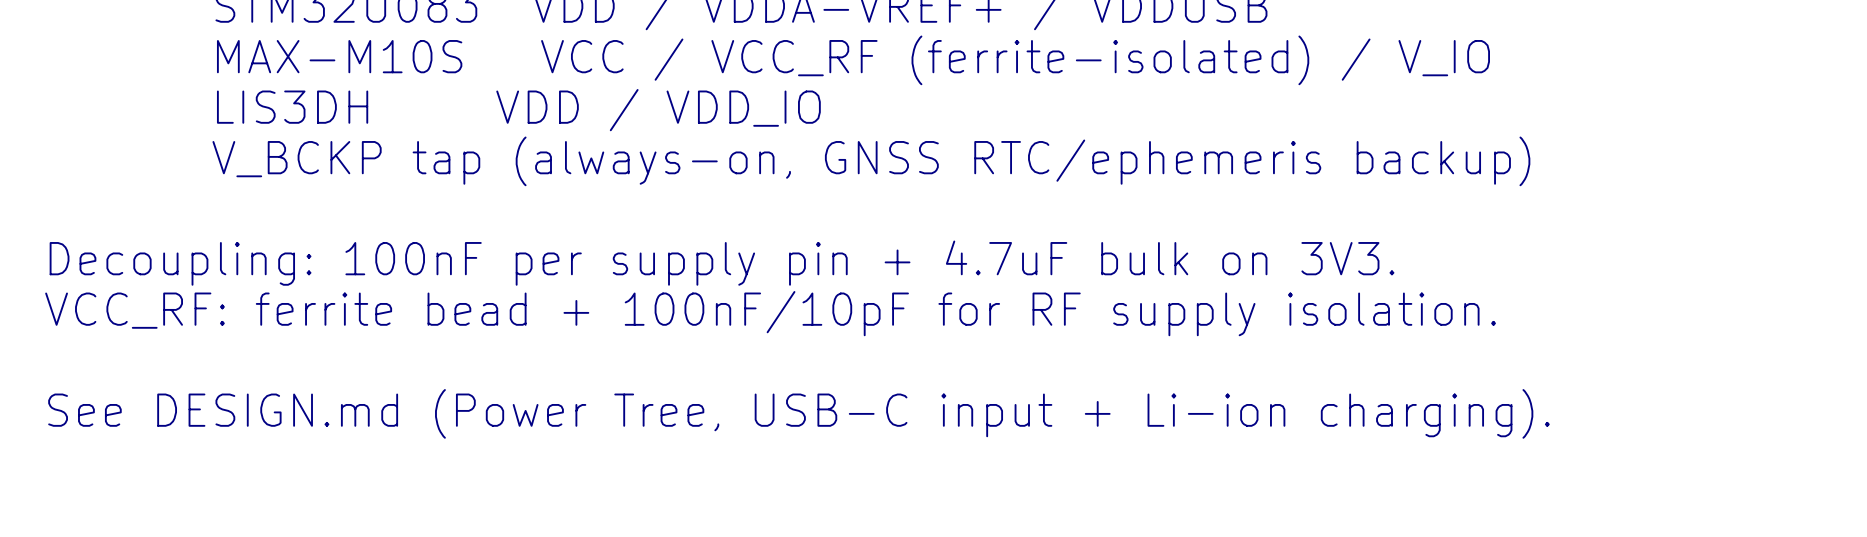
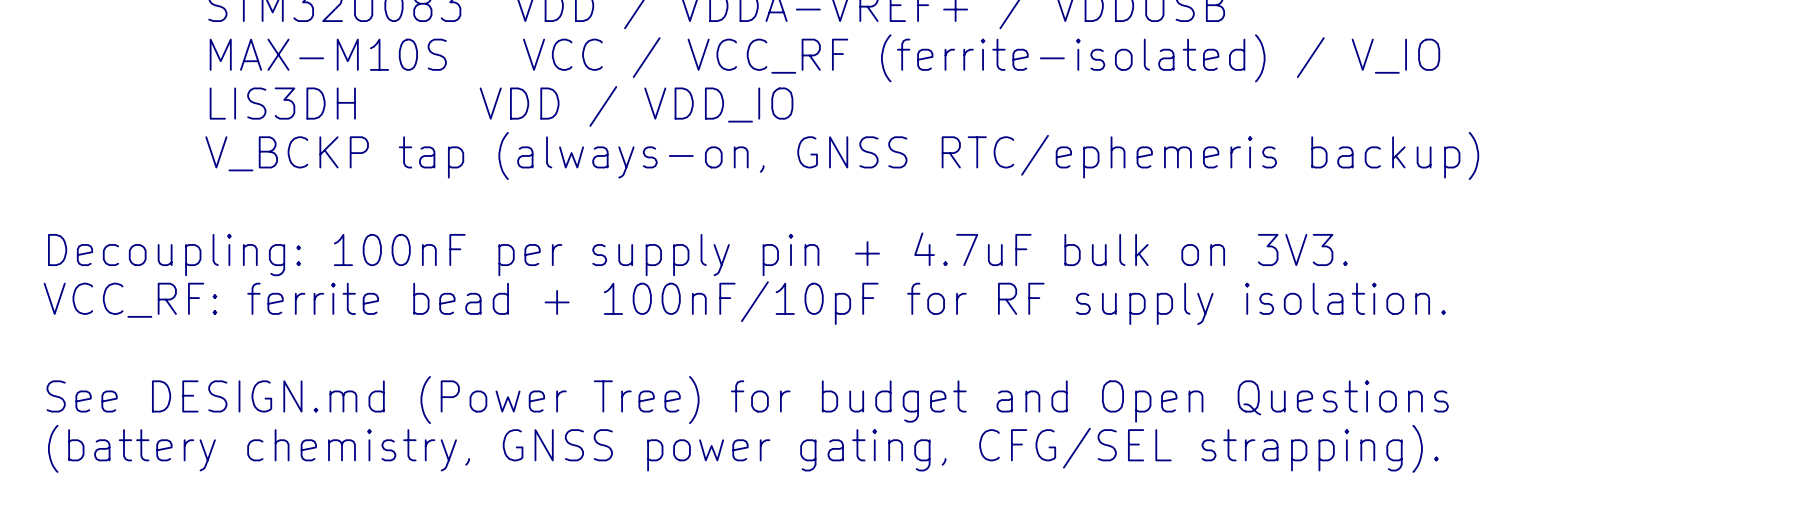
text: See DESIGN.md (Power Tree, USB-C input + Li-ion charging). (798, 413) -> See DESIGN.md (Power Tree) for budget and Open Questions (747, 400)
text: none -> (battery chemistry, GNSS power gating, CFG/SEL strapping). (743, 448)

